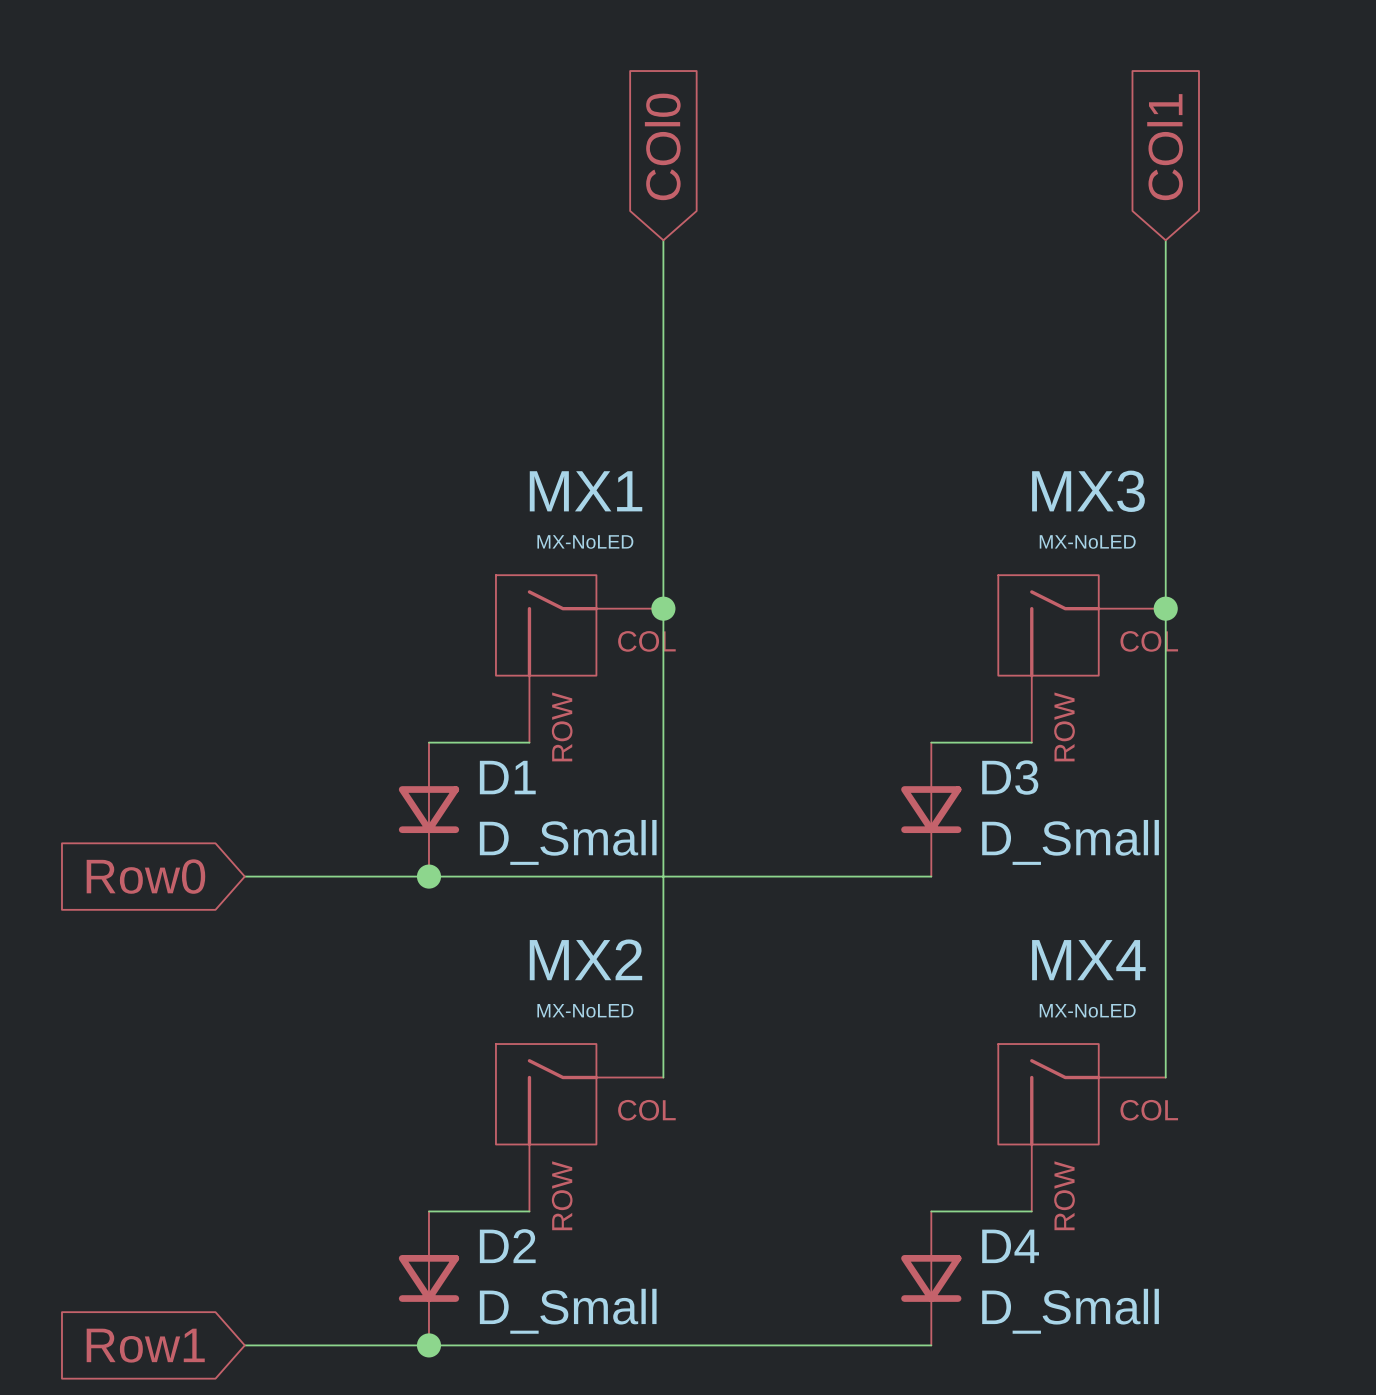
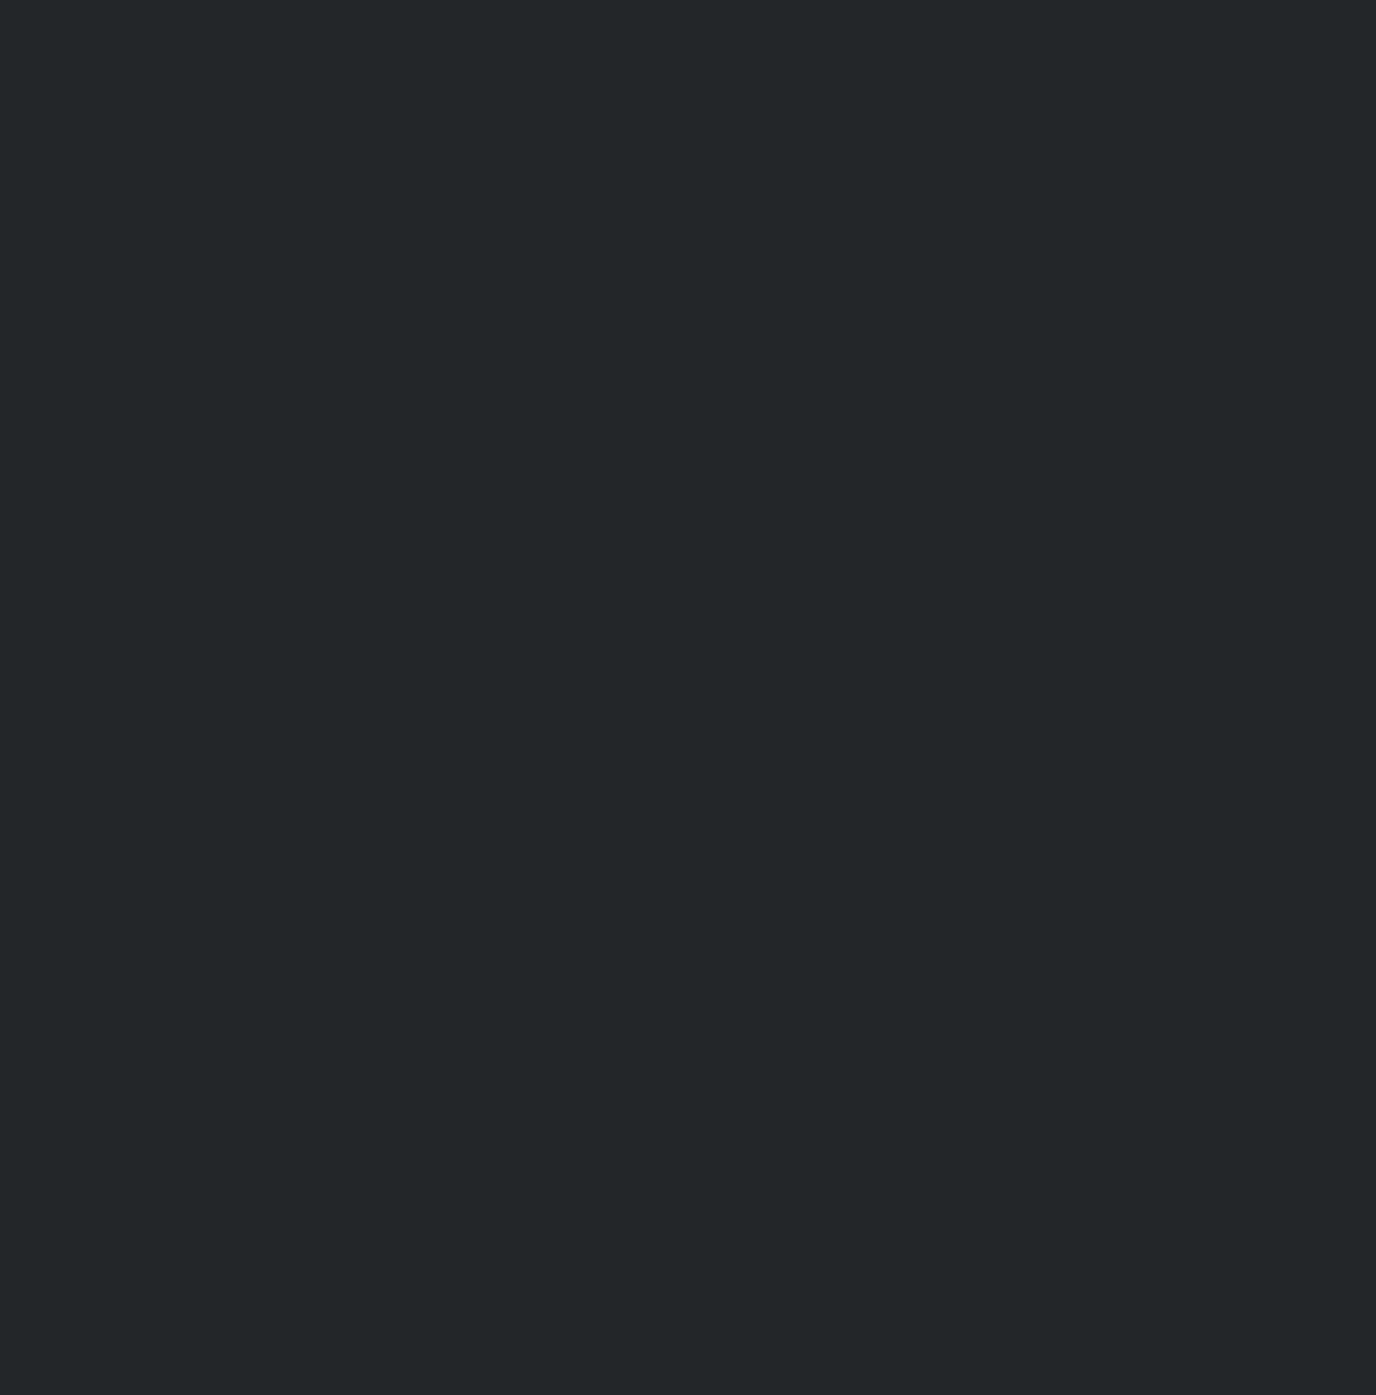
global label: COl0 (662, 146) -> none
global label: COl1 (1165, 147) -> none
wire: (663, 240) (663, 1077) -> none
wire: (1165, 240) (1165, 1077) -> none
junction: (663, 608) -> none
junction: (1165, 608) -> none
MX1: MX-NoLED (579, 658) -> none
MX3: MX-NoLED (1082, 658) -> none
wire: (428, 742) (529, 742) -> none
wire: (931, 742) (1031, 742) -> none
D1: D_Small (428, 809) -> none
D3: D_Small (931, 809) -> none
global label: Row0 (145, 876) -> none
wire: (244, 876) (931, 876) -> none
junction: (428, 876) -> none
MX2: MX-NoLED (579, 1127) -> none
MX4: MX-NoLED (1082, 1127) -> none
wire: (428, 1211) (529, 1211) -> none
wire: (931, 1211) (1031, 1211) -> none
D2: D_Small (428, 1278) -> none
D4: D_Small (931, 1278) -> none
global label: Row1 (145, 1345) -> none
wire: (244, 1345) (931, 1345) -> none
junction: (428, 1345) -> none

